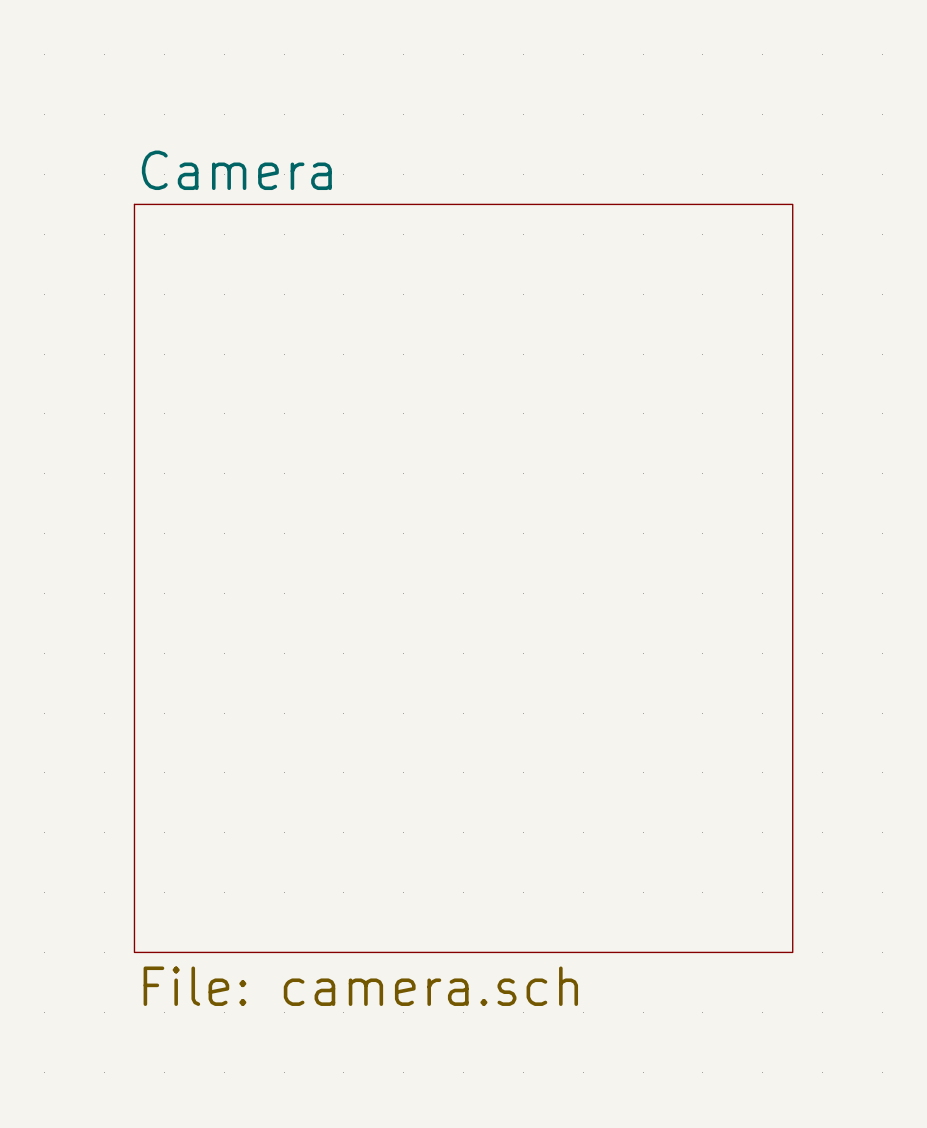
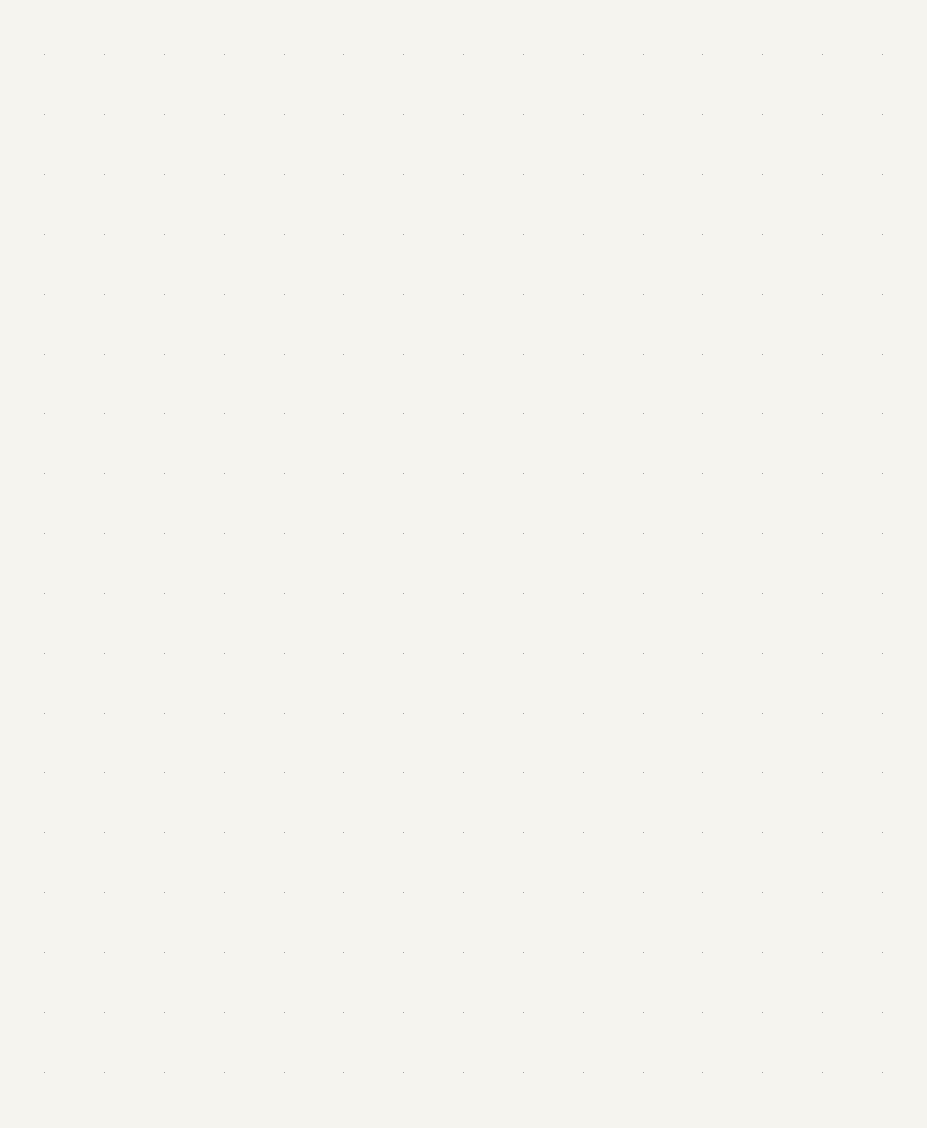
sheet Camera: File: camera.sch (463, 578) -> none

